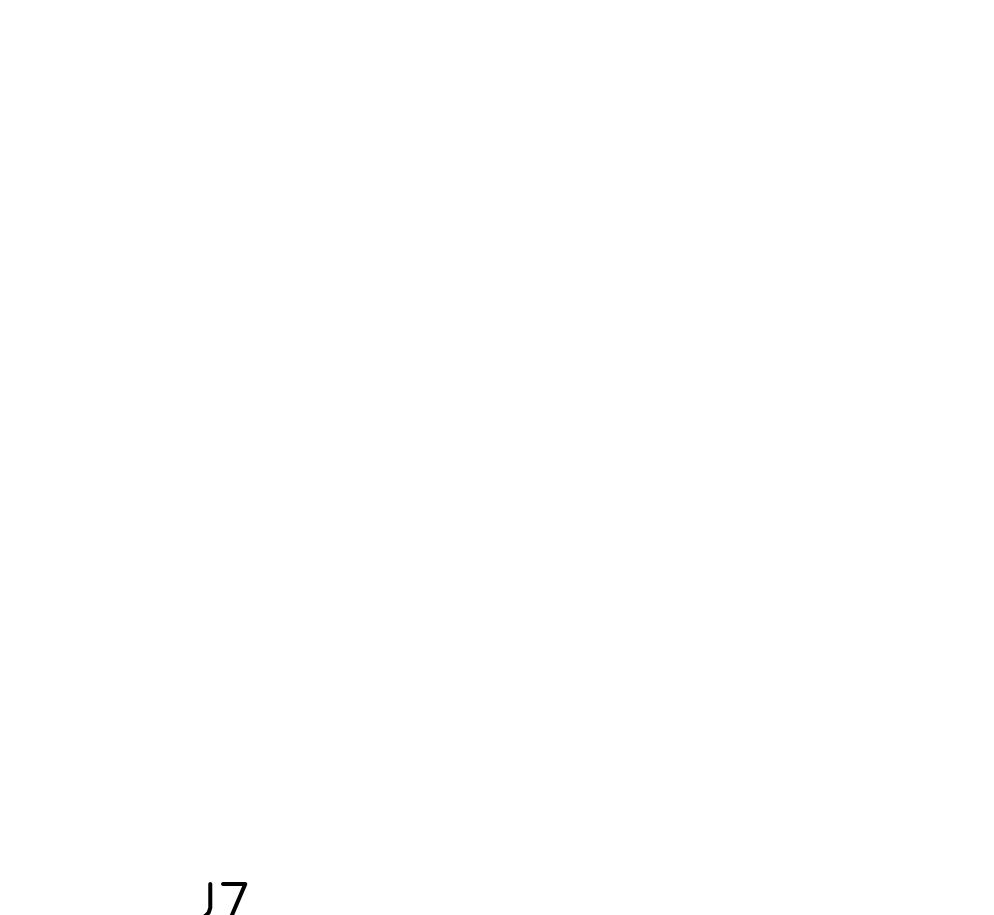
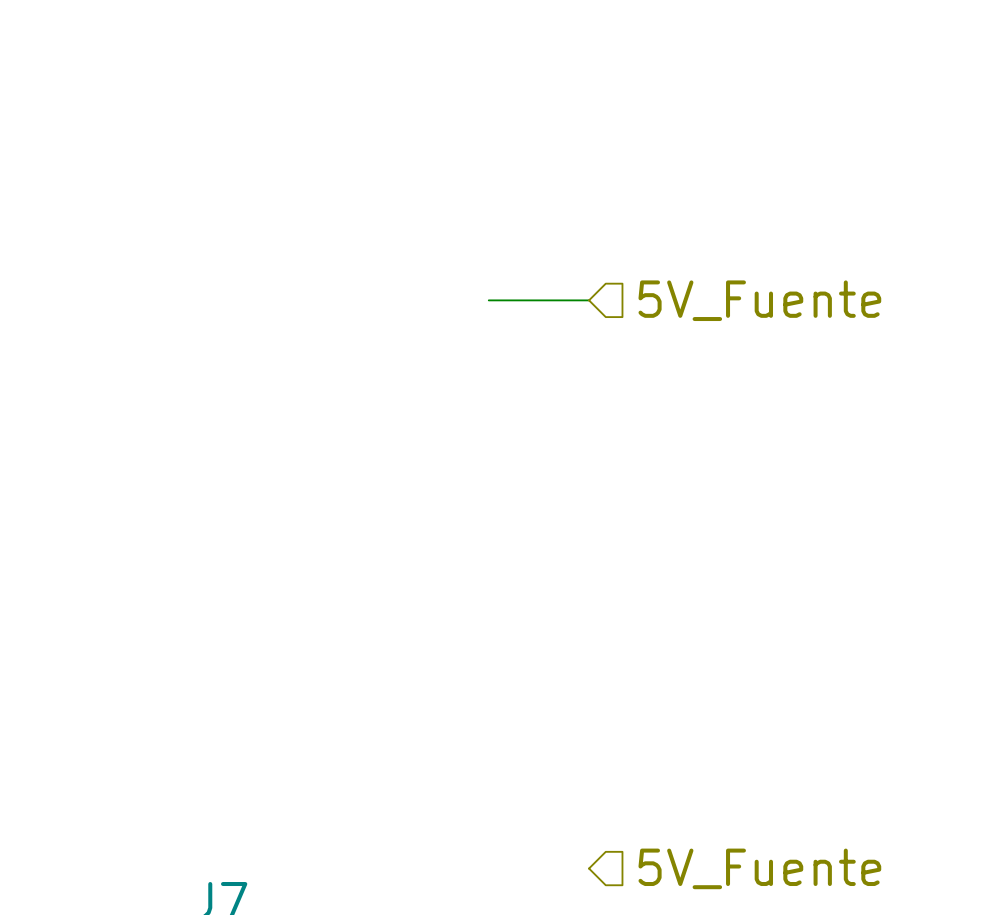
wire: none -> (488, 300) (589, 300)
hierarchical label: none -> 5V_Fuente (759, 300)
hierarchical label: none -> 5V_Fuente (759, 868)

